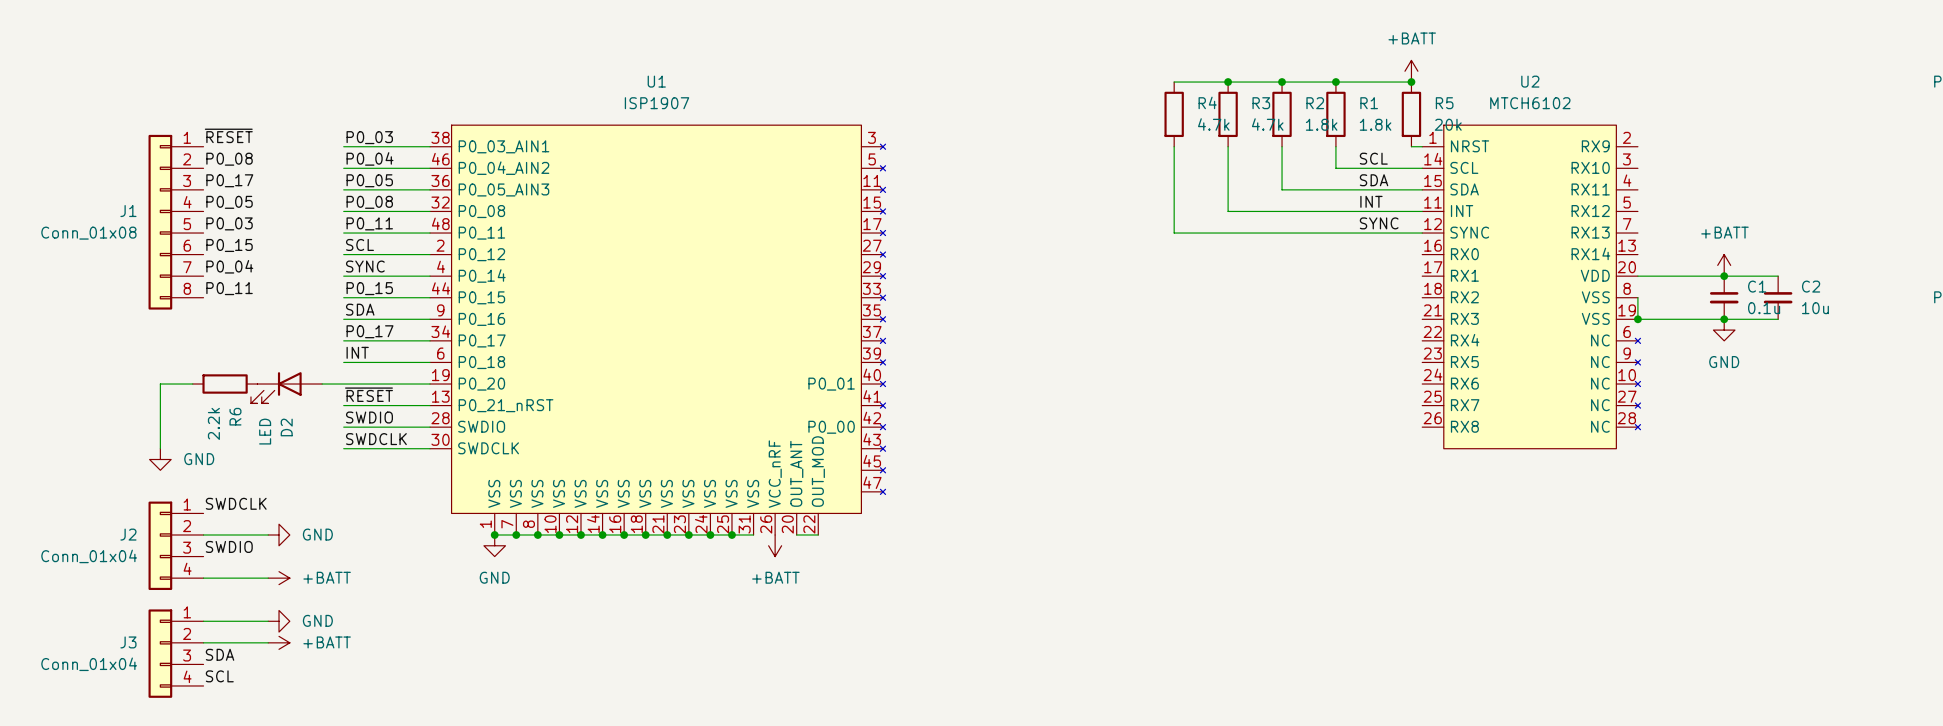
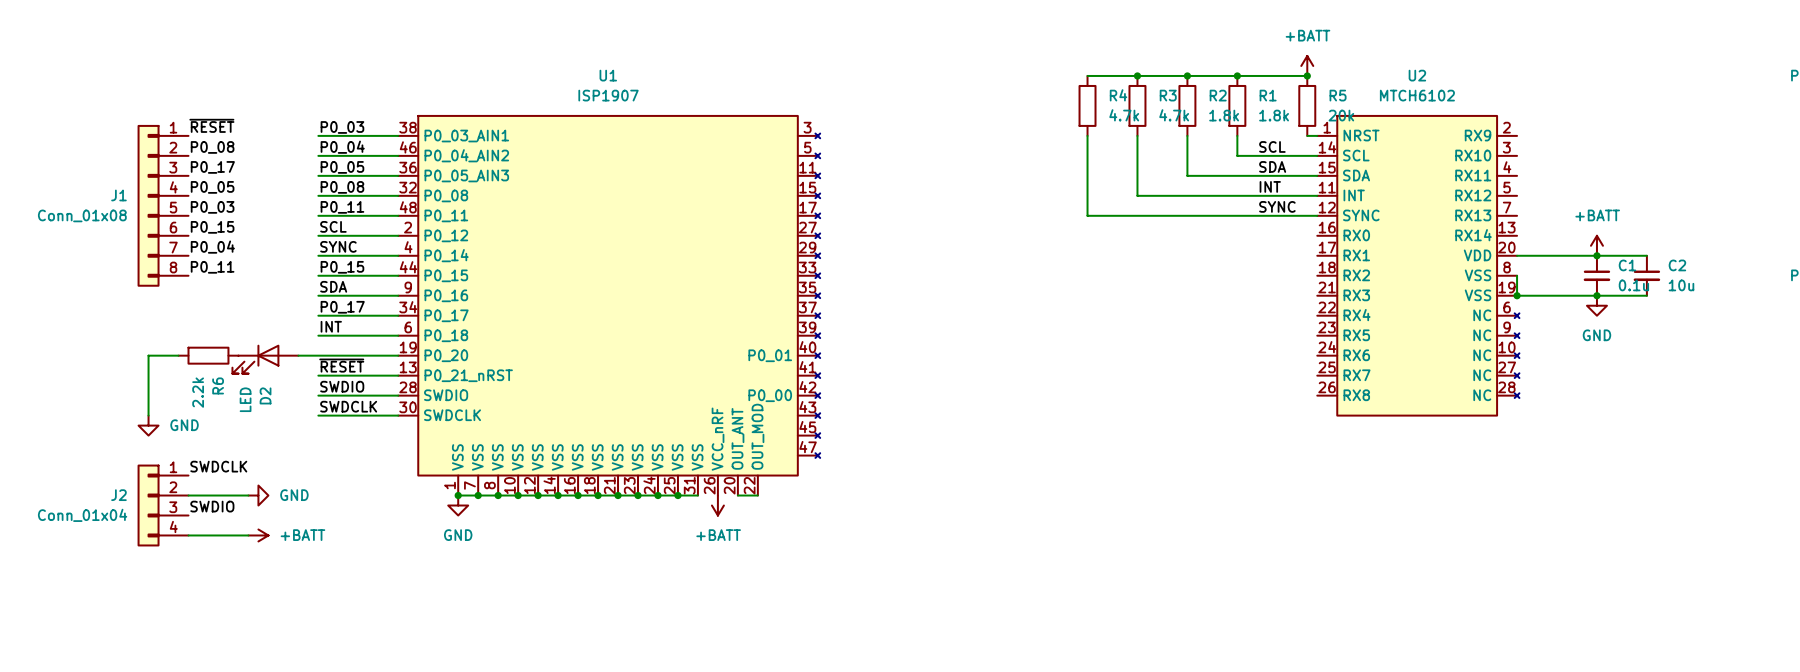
wire: (203, 621) (268, 621) -> none
power symbol: GND (279, 621) -> none
wire: (203, 642) (268, 642) -> none
power symbol: +BATT (279, 642) -> none
J3: Conn_01x04 (176, 653) -> none
label: SDA (220, 654) -> none
label: SCL (219, 676) -> none

